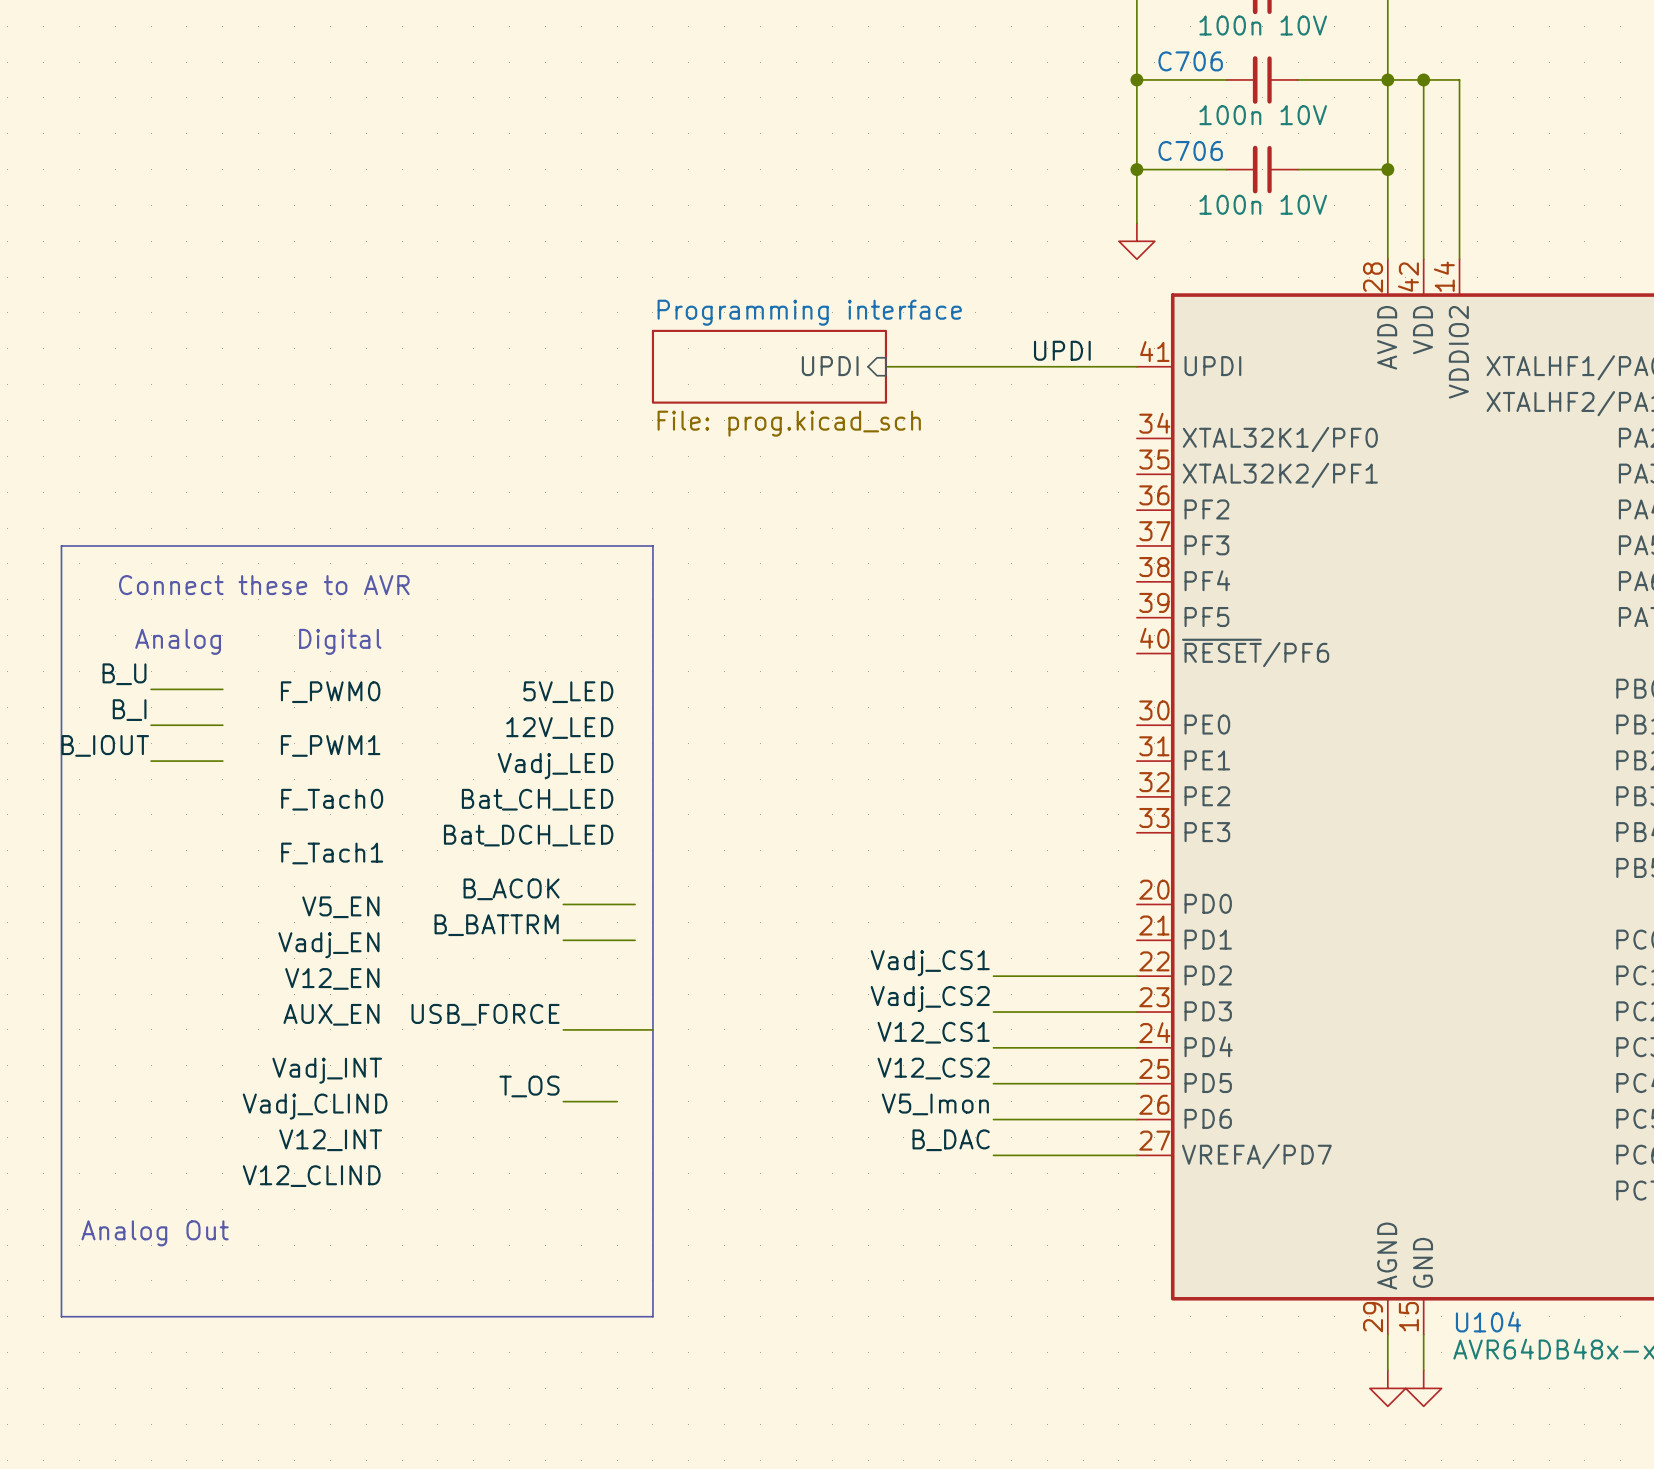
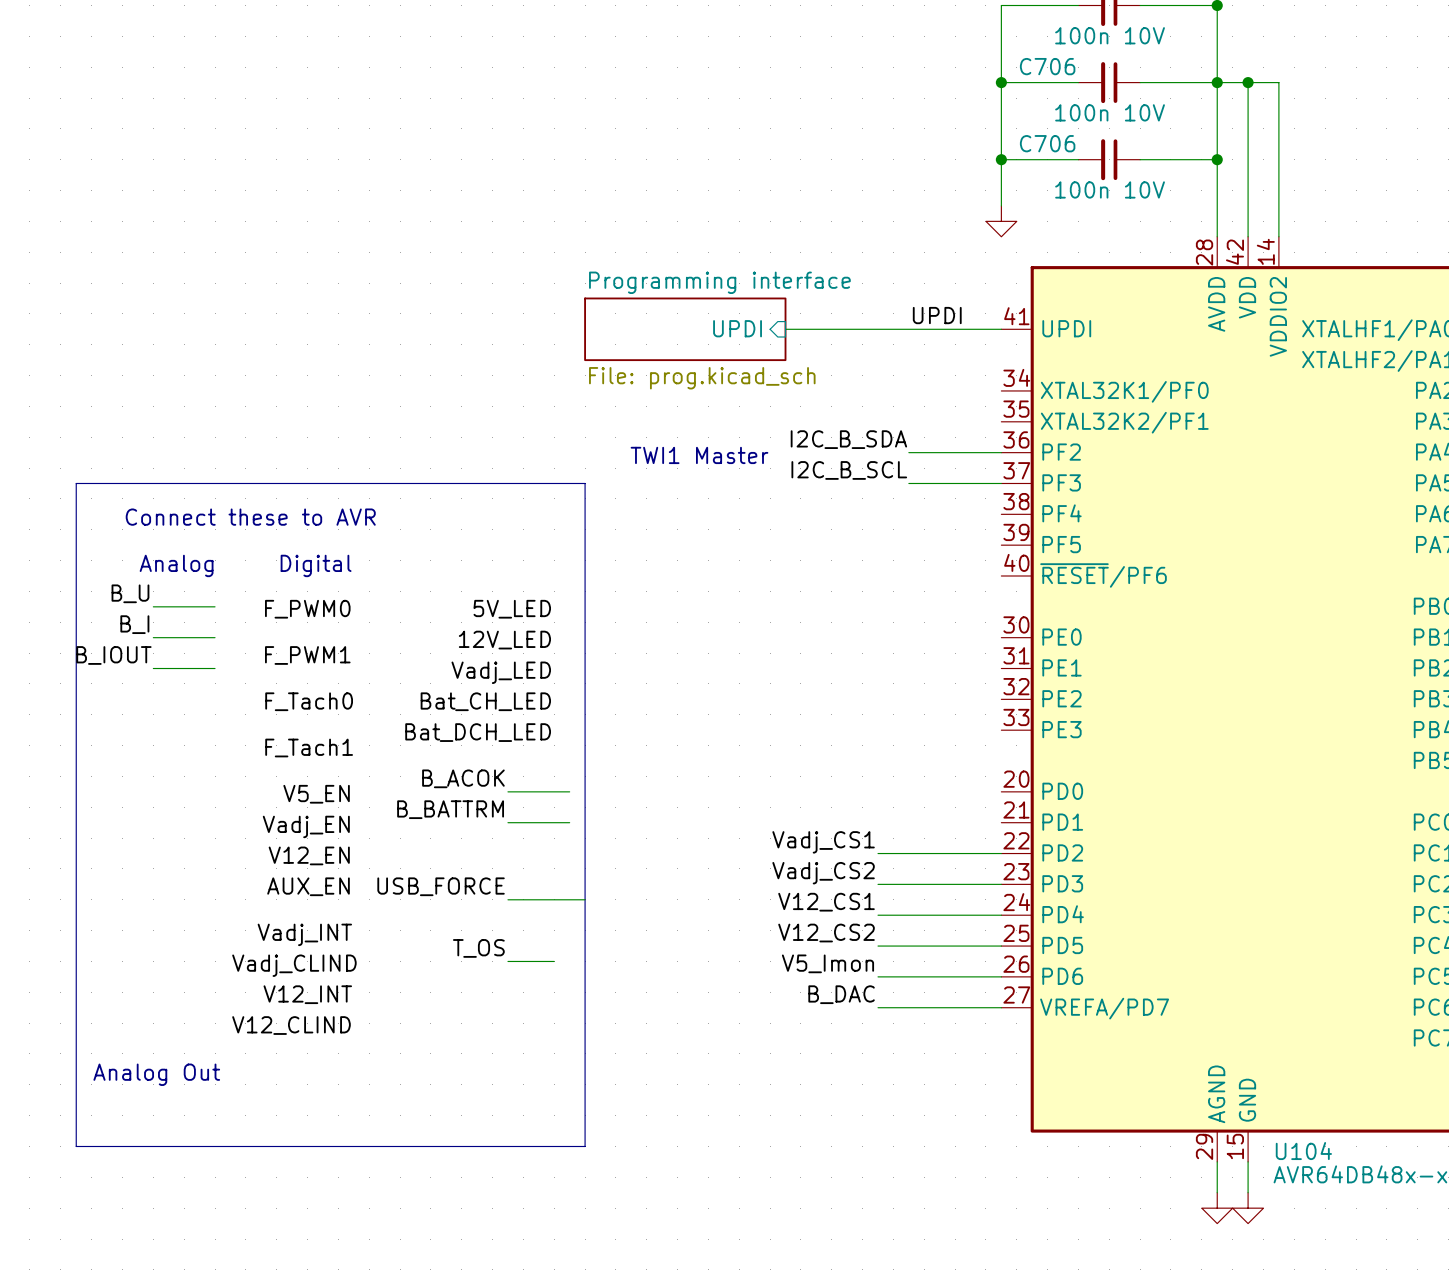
label: none -> I2C_B_SDA (848, 439)
wire: none -> (908, 452) (1001, 452)
text: none -> TWI1 Master (699, 455)
label: none -> I2C_B_SCL (849, 470)
wire: none -> (908, 483) (1001, 483)

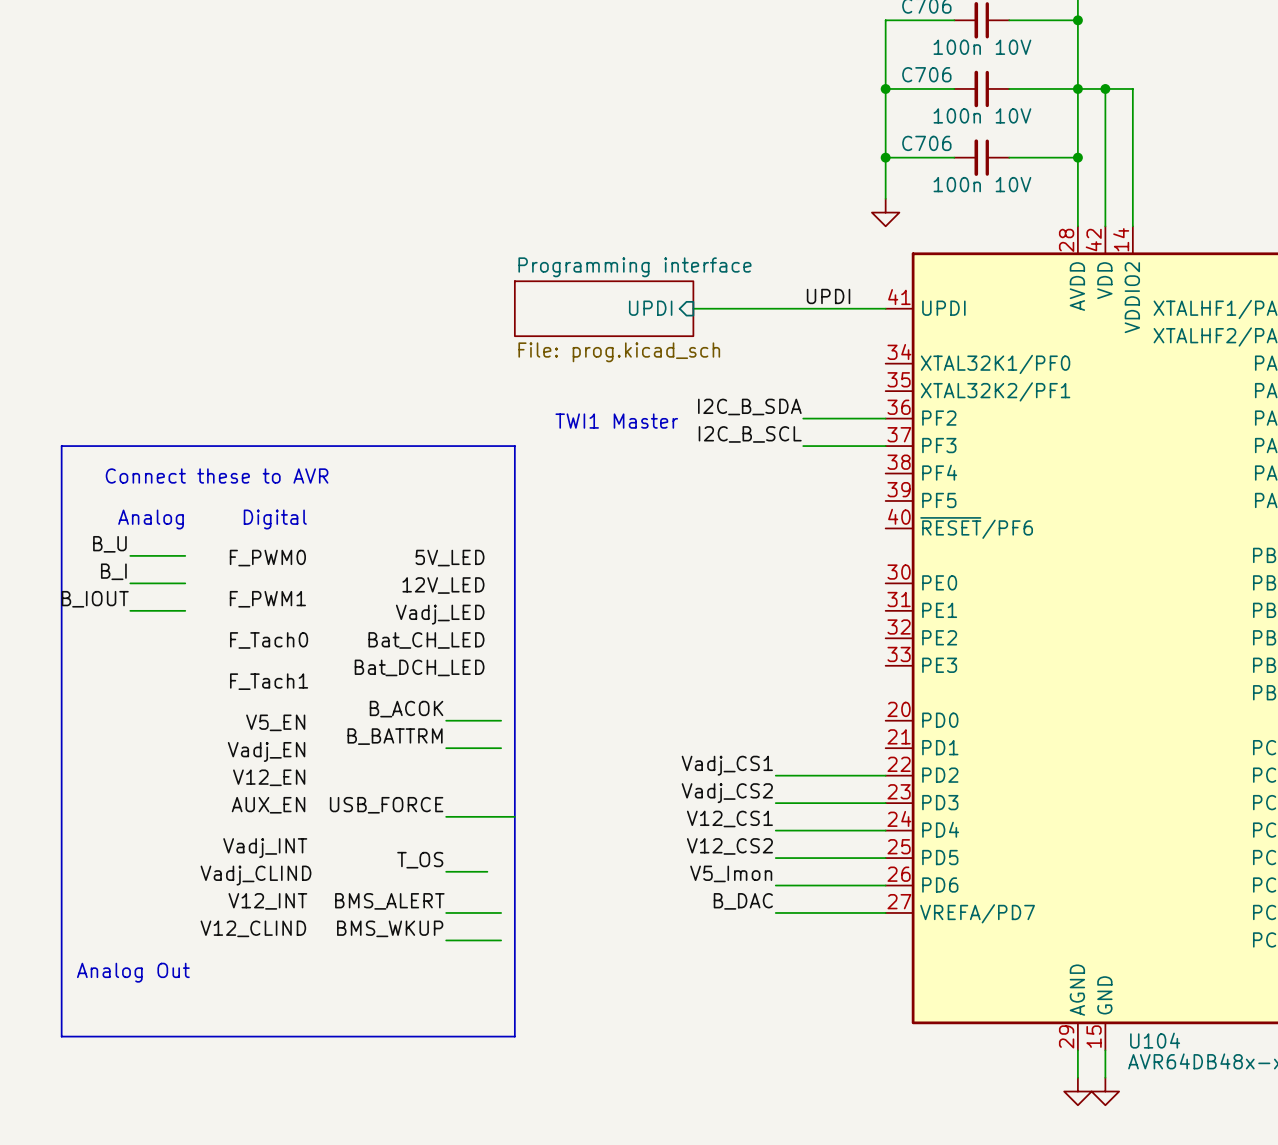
label: none -> BMS_ALERT (389, 901)
wire: none -> (446, 912) (501, 912)
label: none -> BMS_WKUP (390, 928)
wire: none -> (446, 940) (501, 940)

